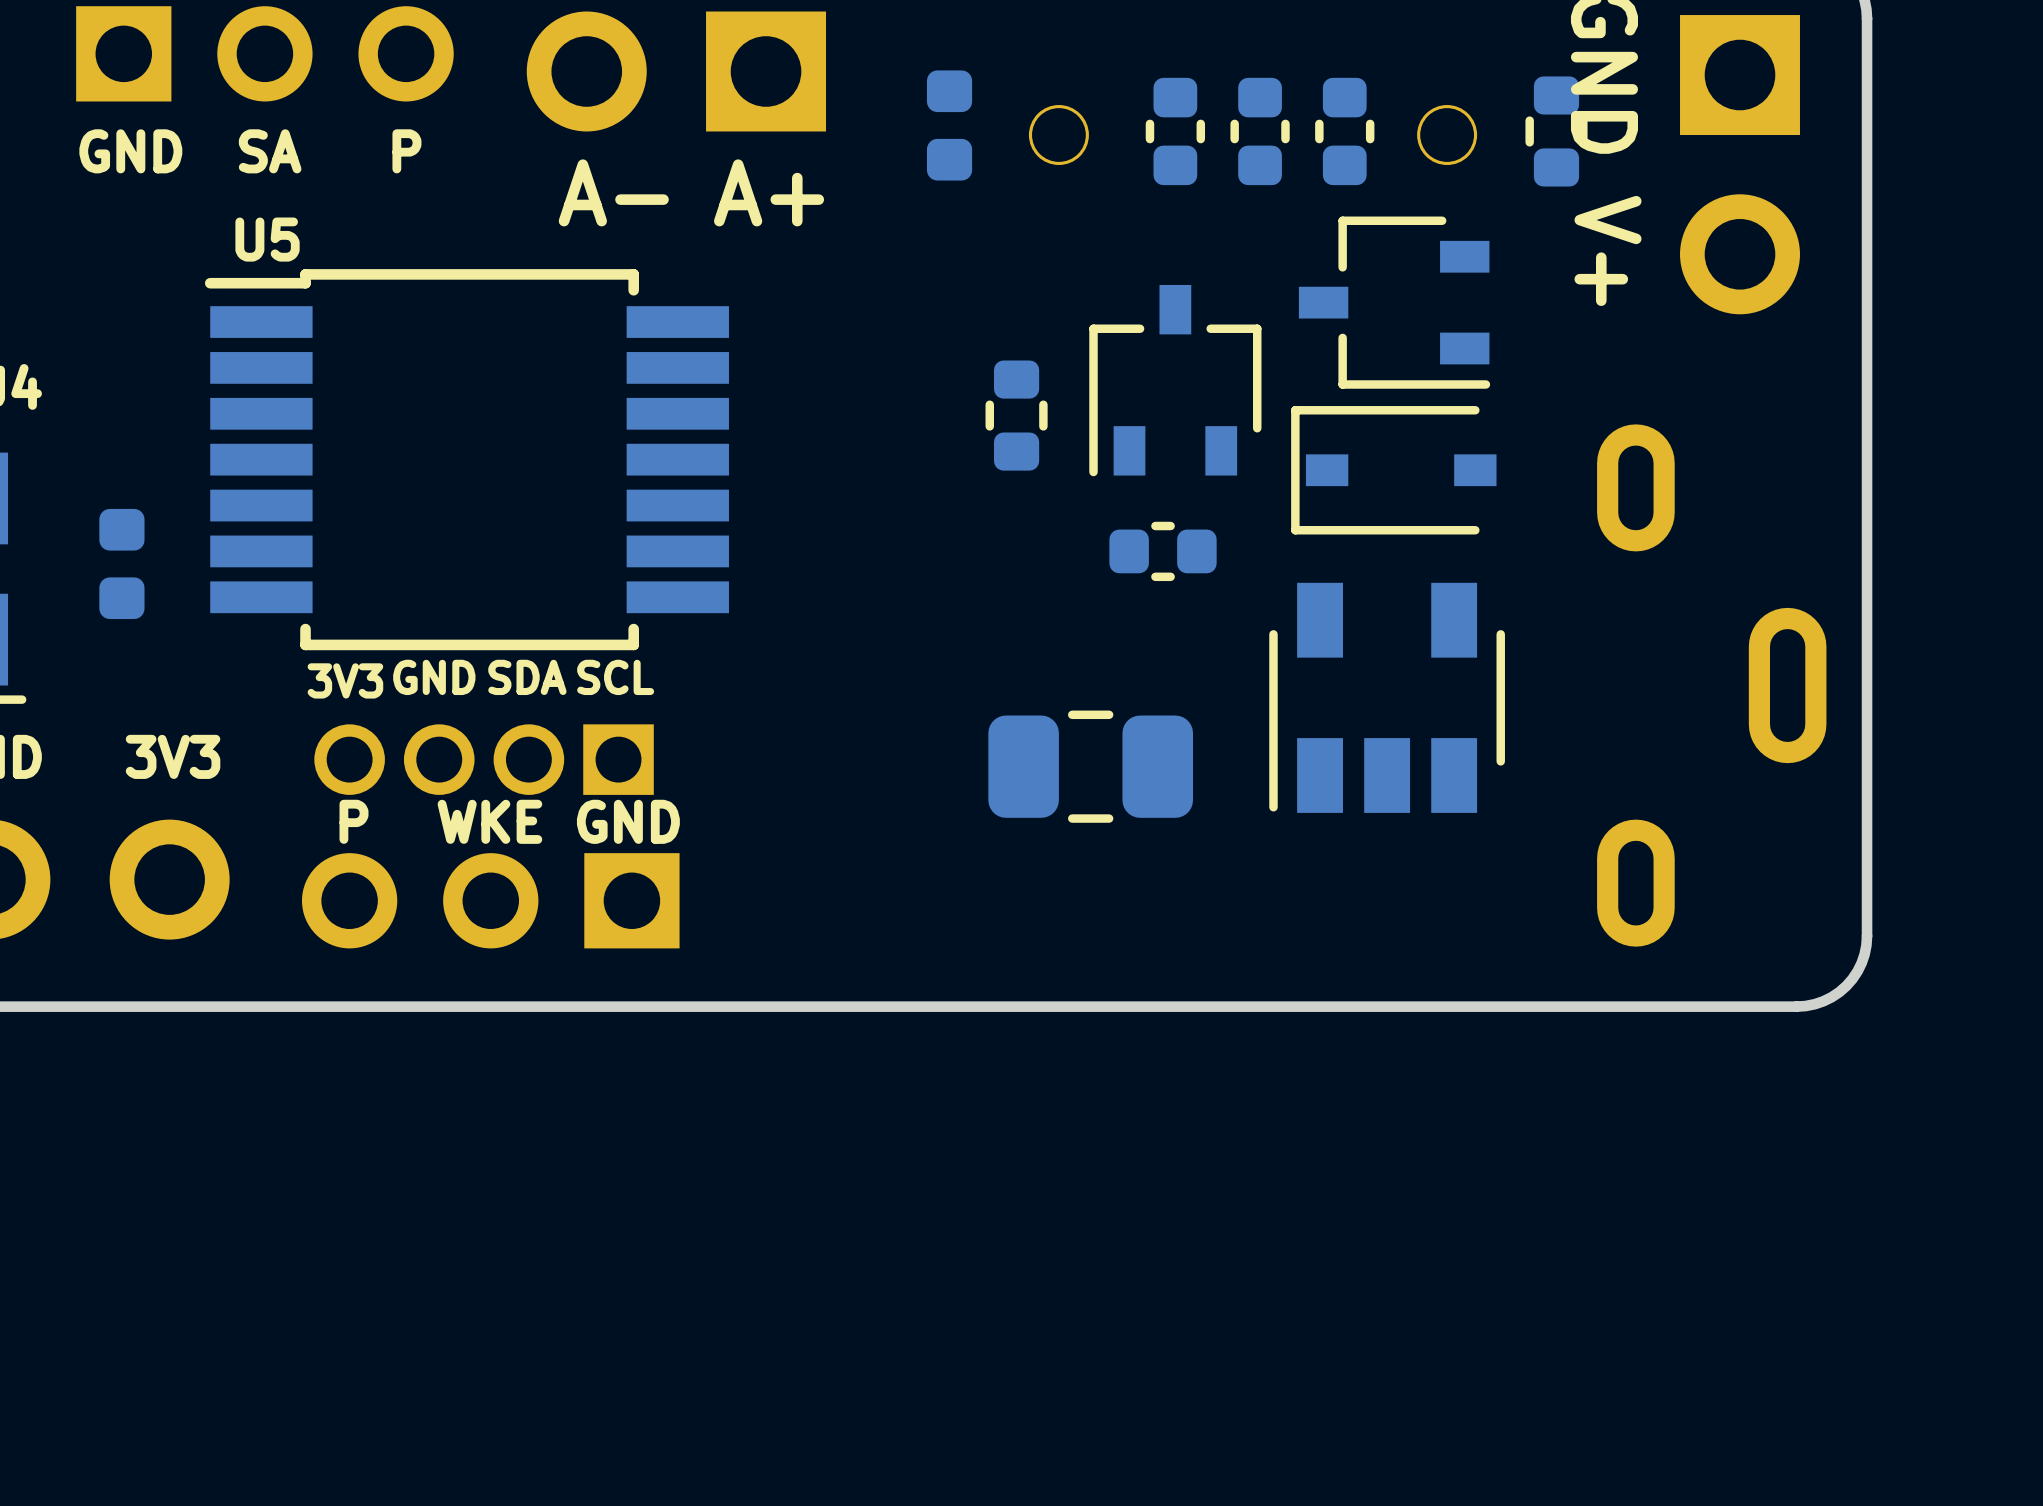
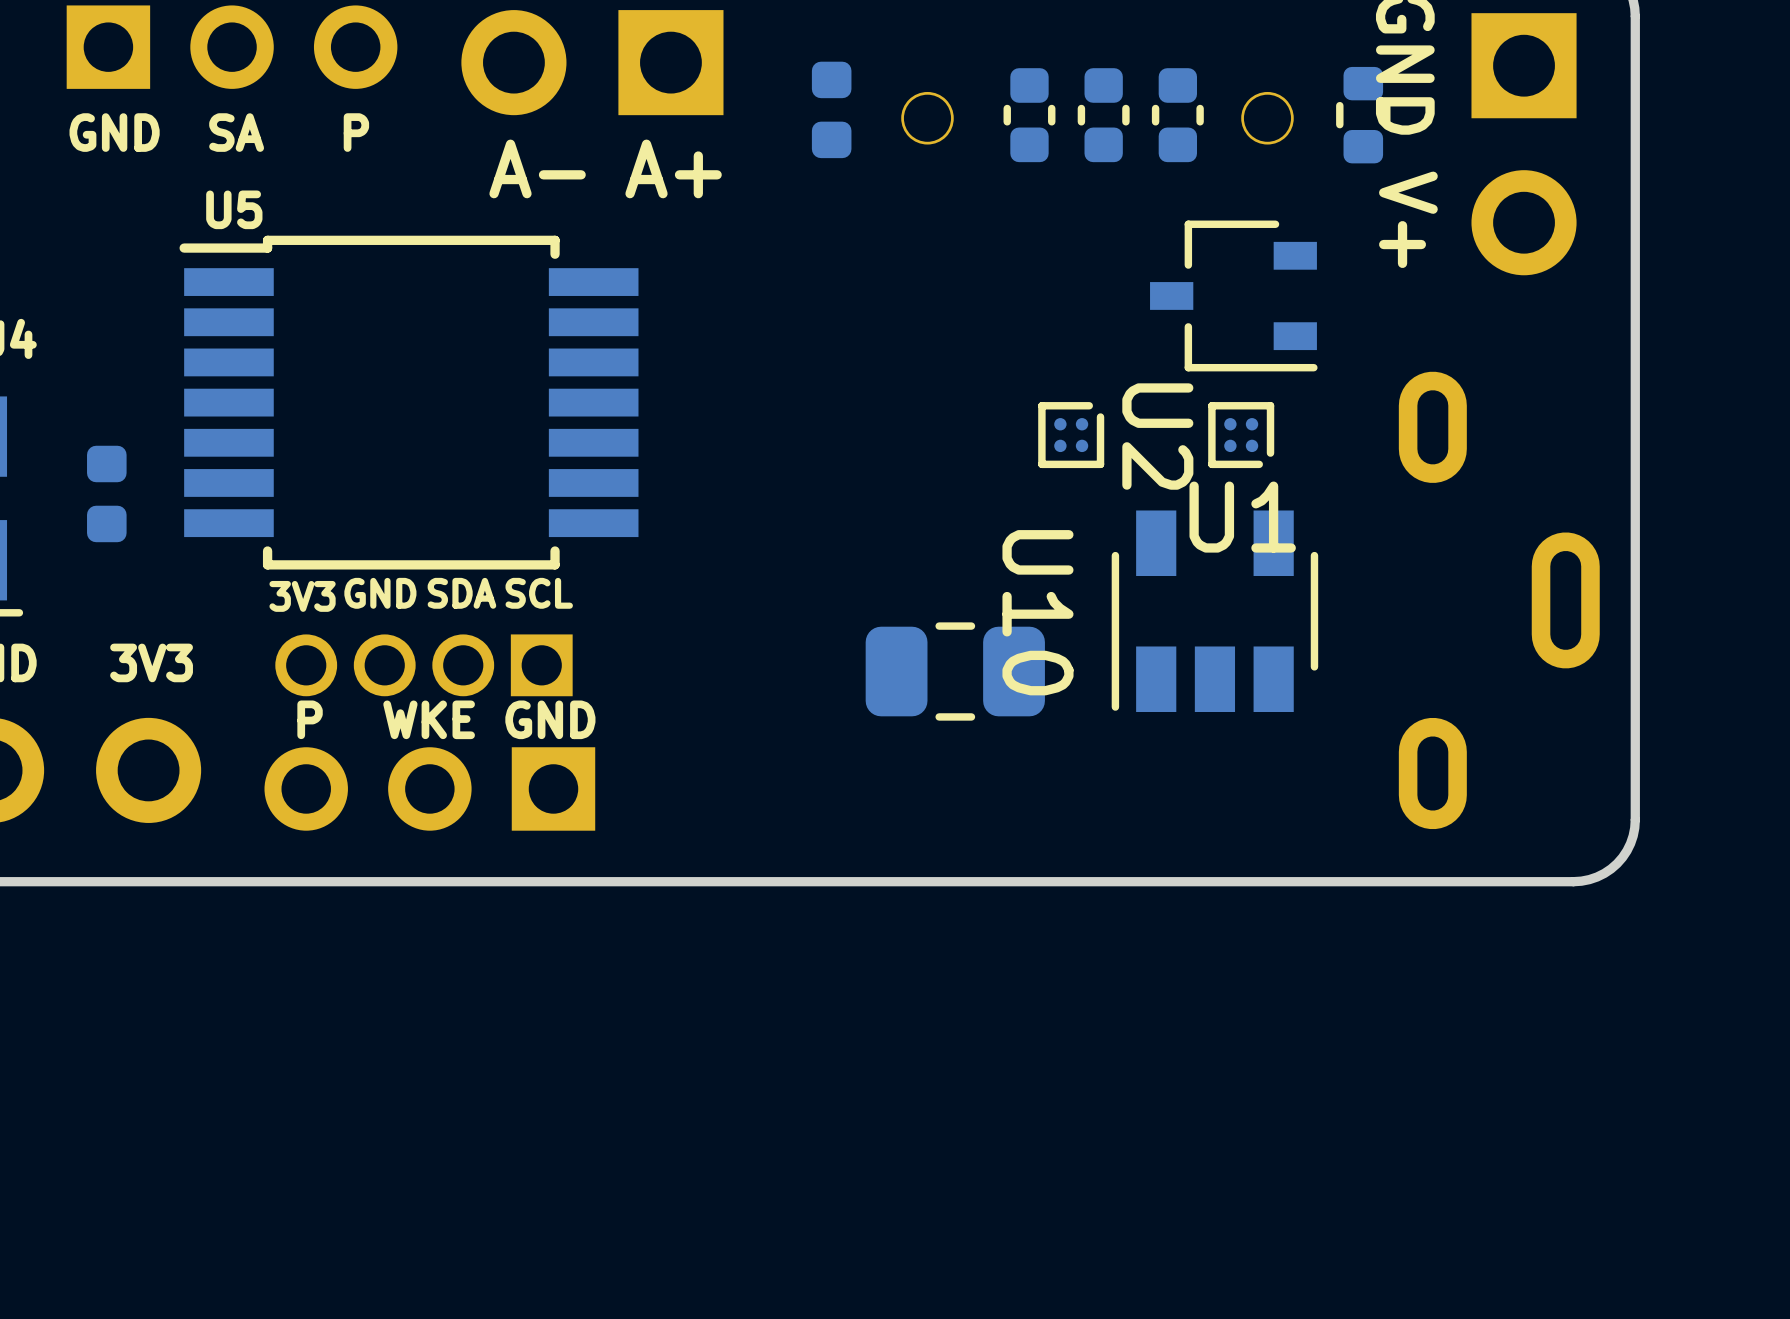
part position: (1394, 302) -> (1233, 295)
part: (1175, 380) -> none
part: (1016, 415) -> none
part: (1393, 470) -> none
U2: none -> (1071, 435)
U1: none -> (1241, 435)
part: (1163, 551) -> none
U10 name: none -> U10 (1037, 612)

